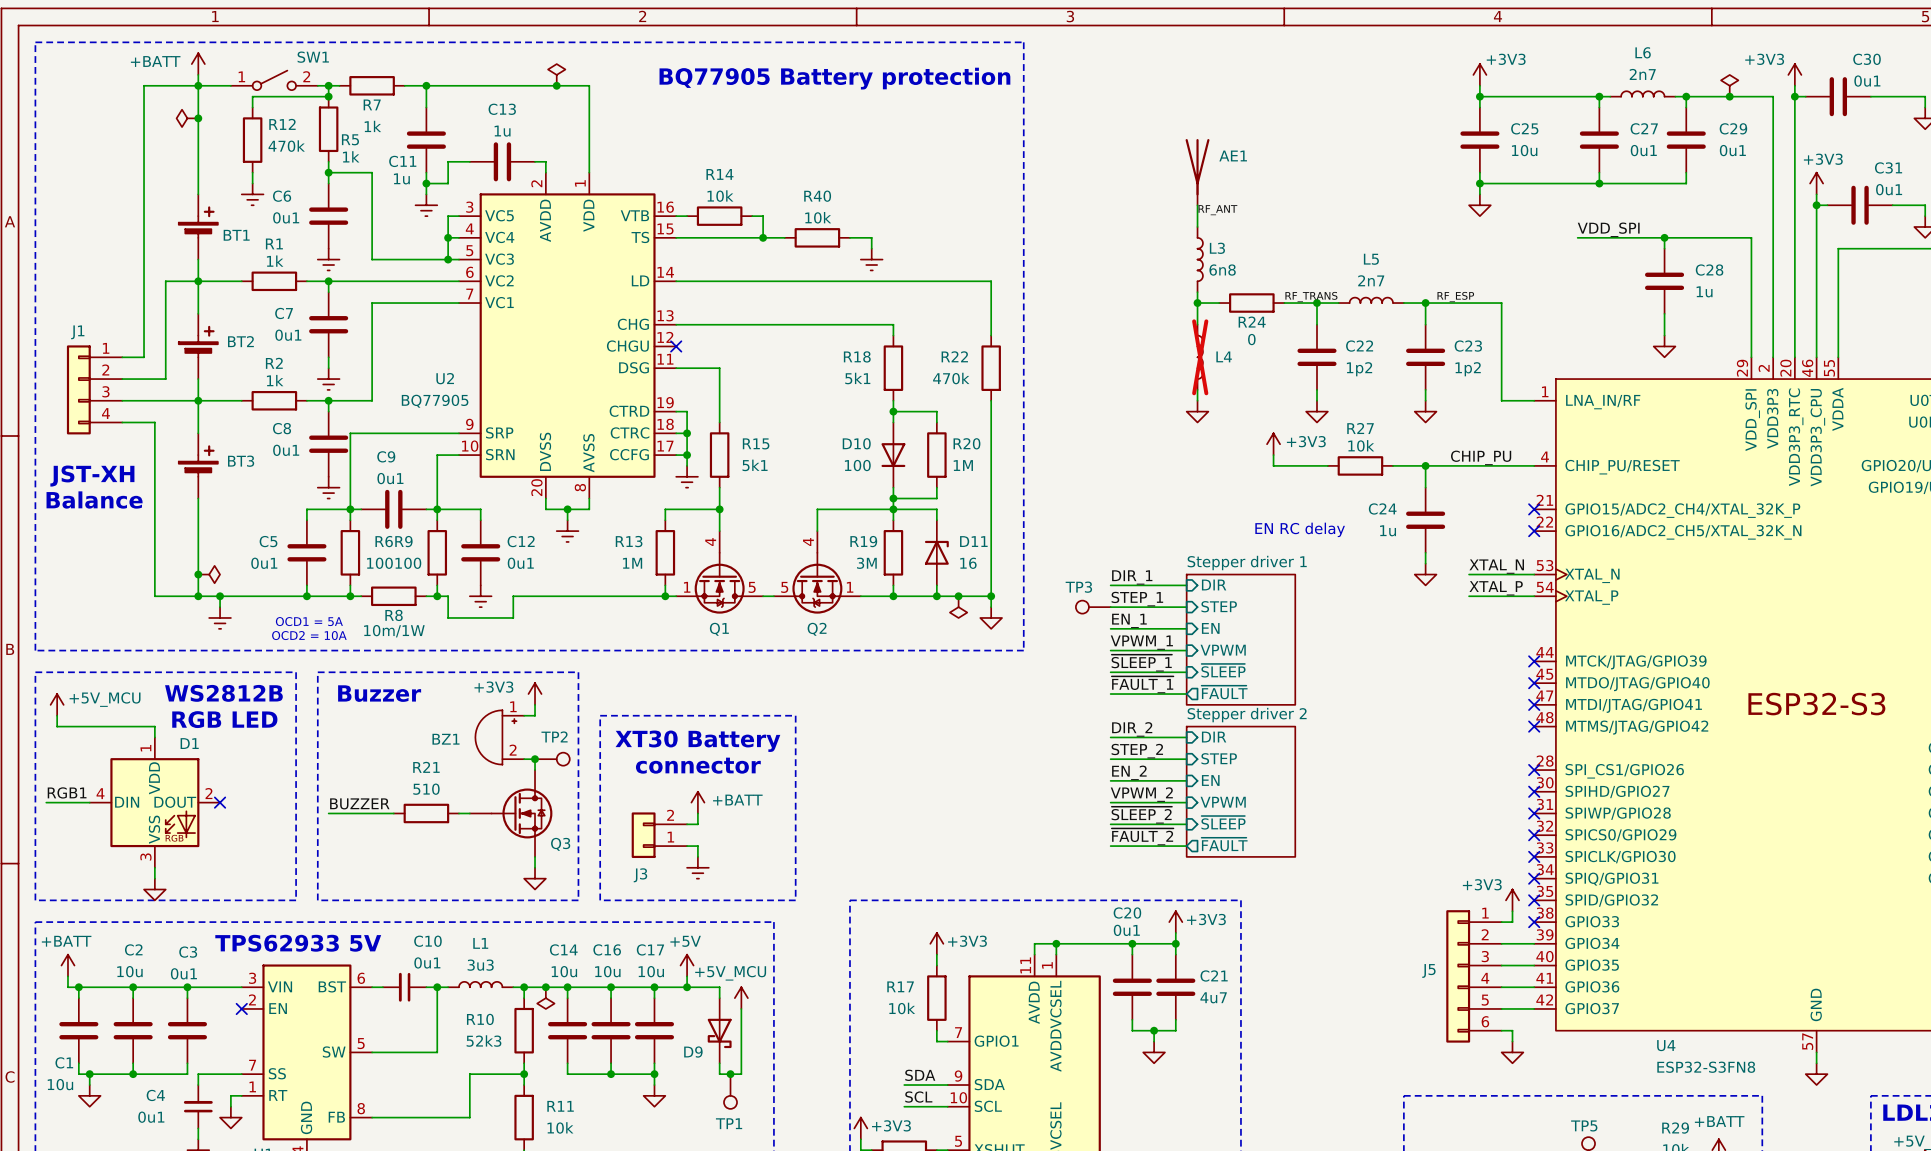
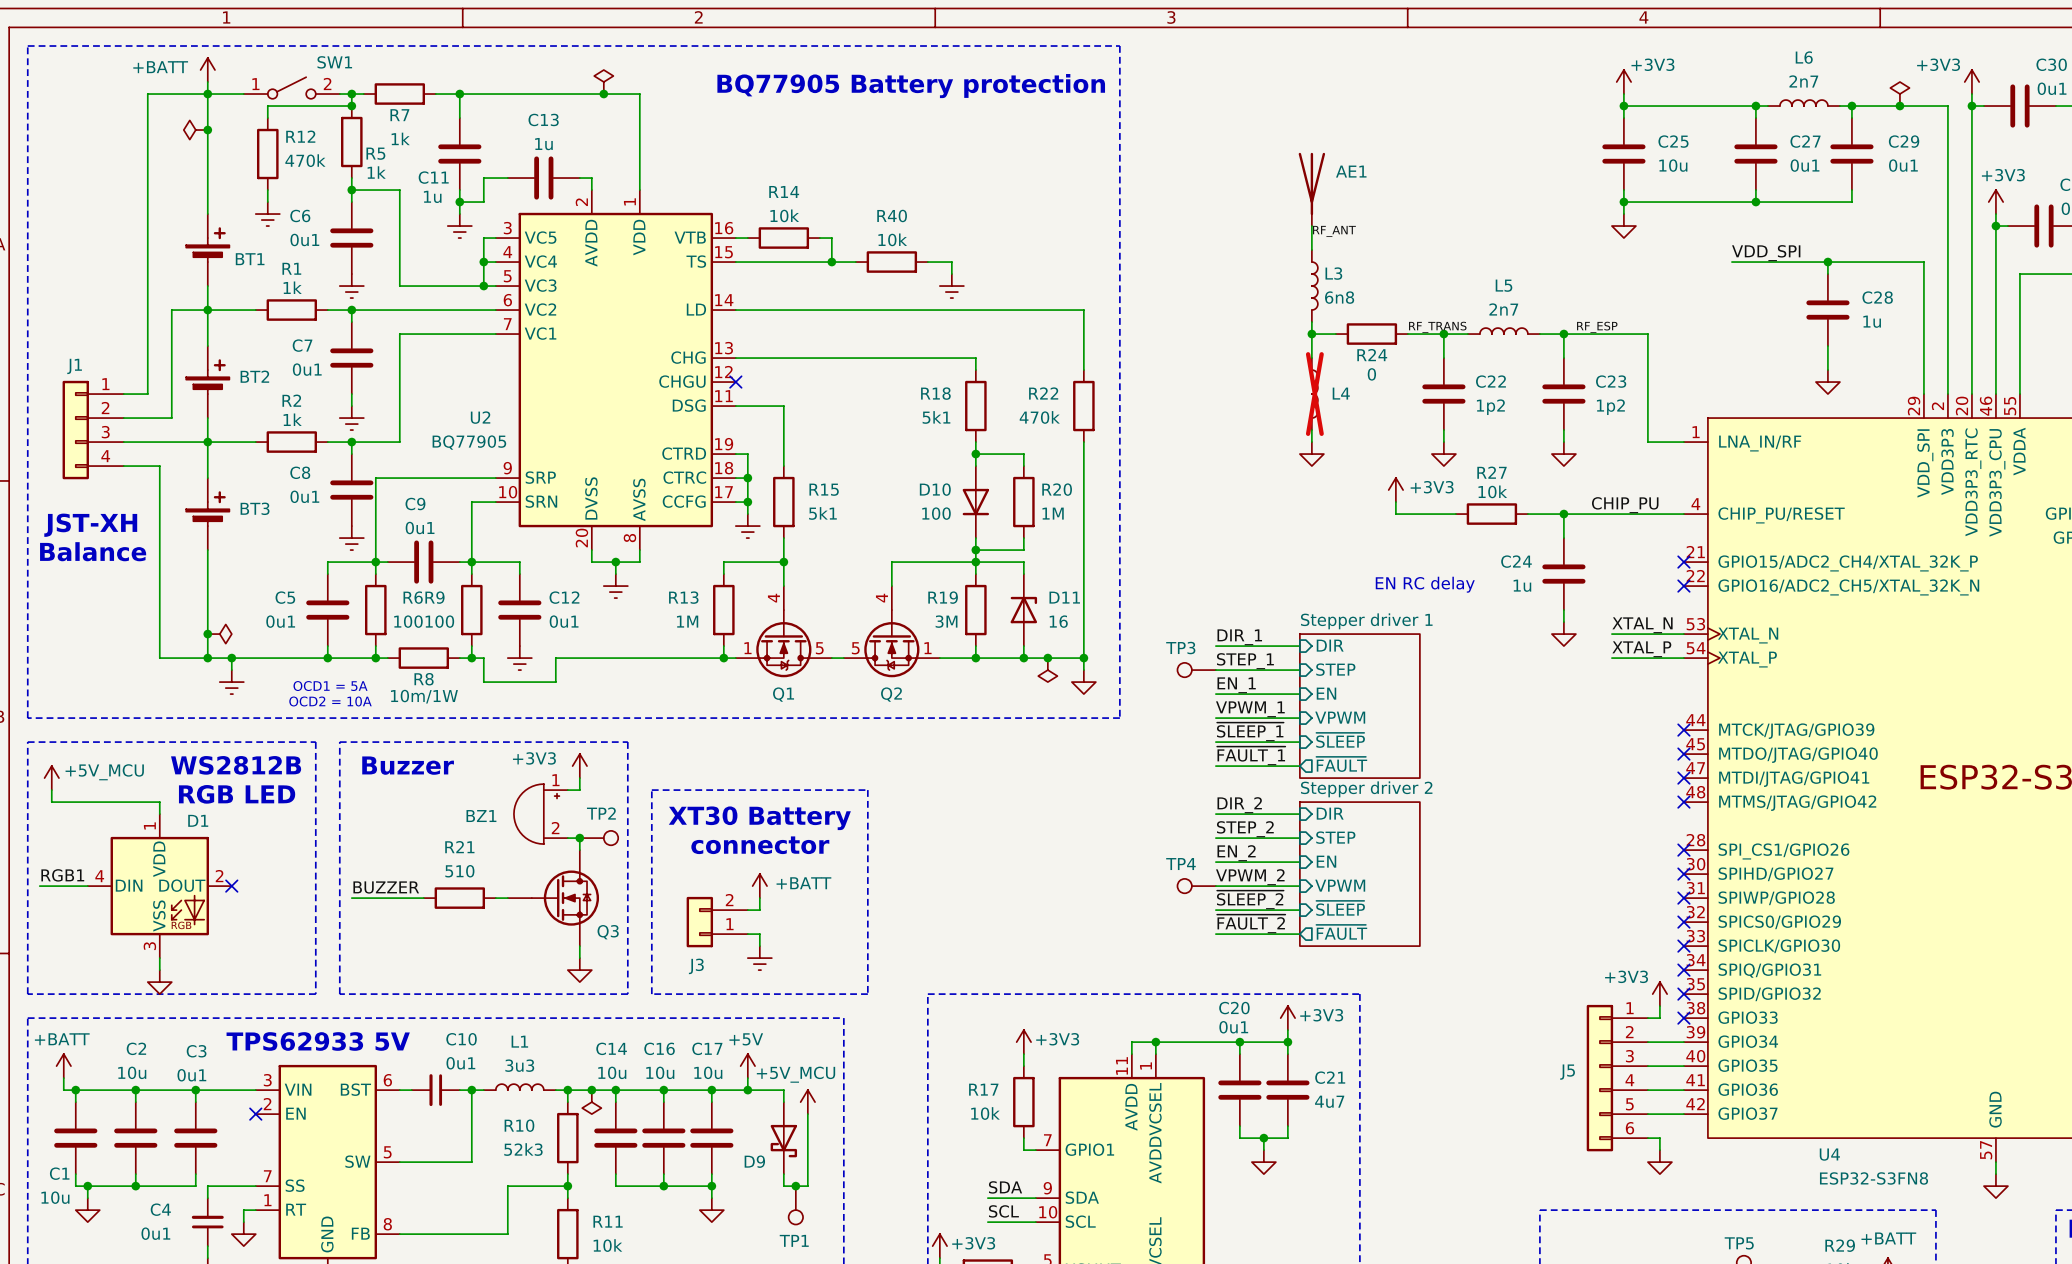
TP4: none -> (1196, 886)

